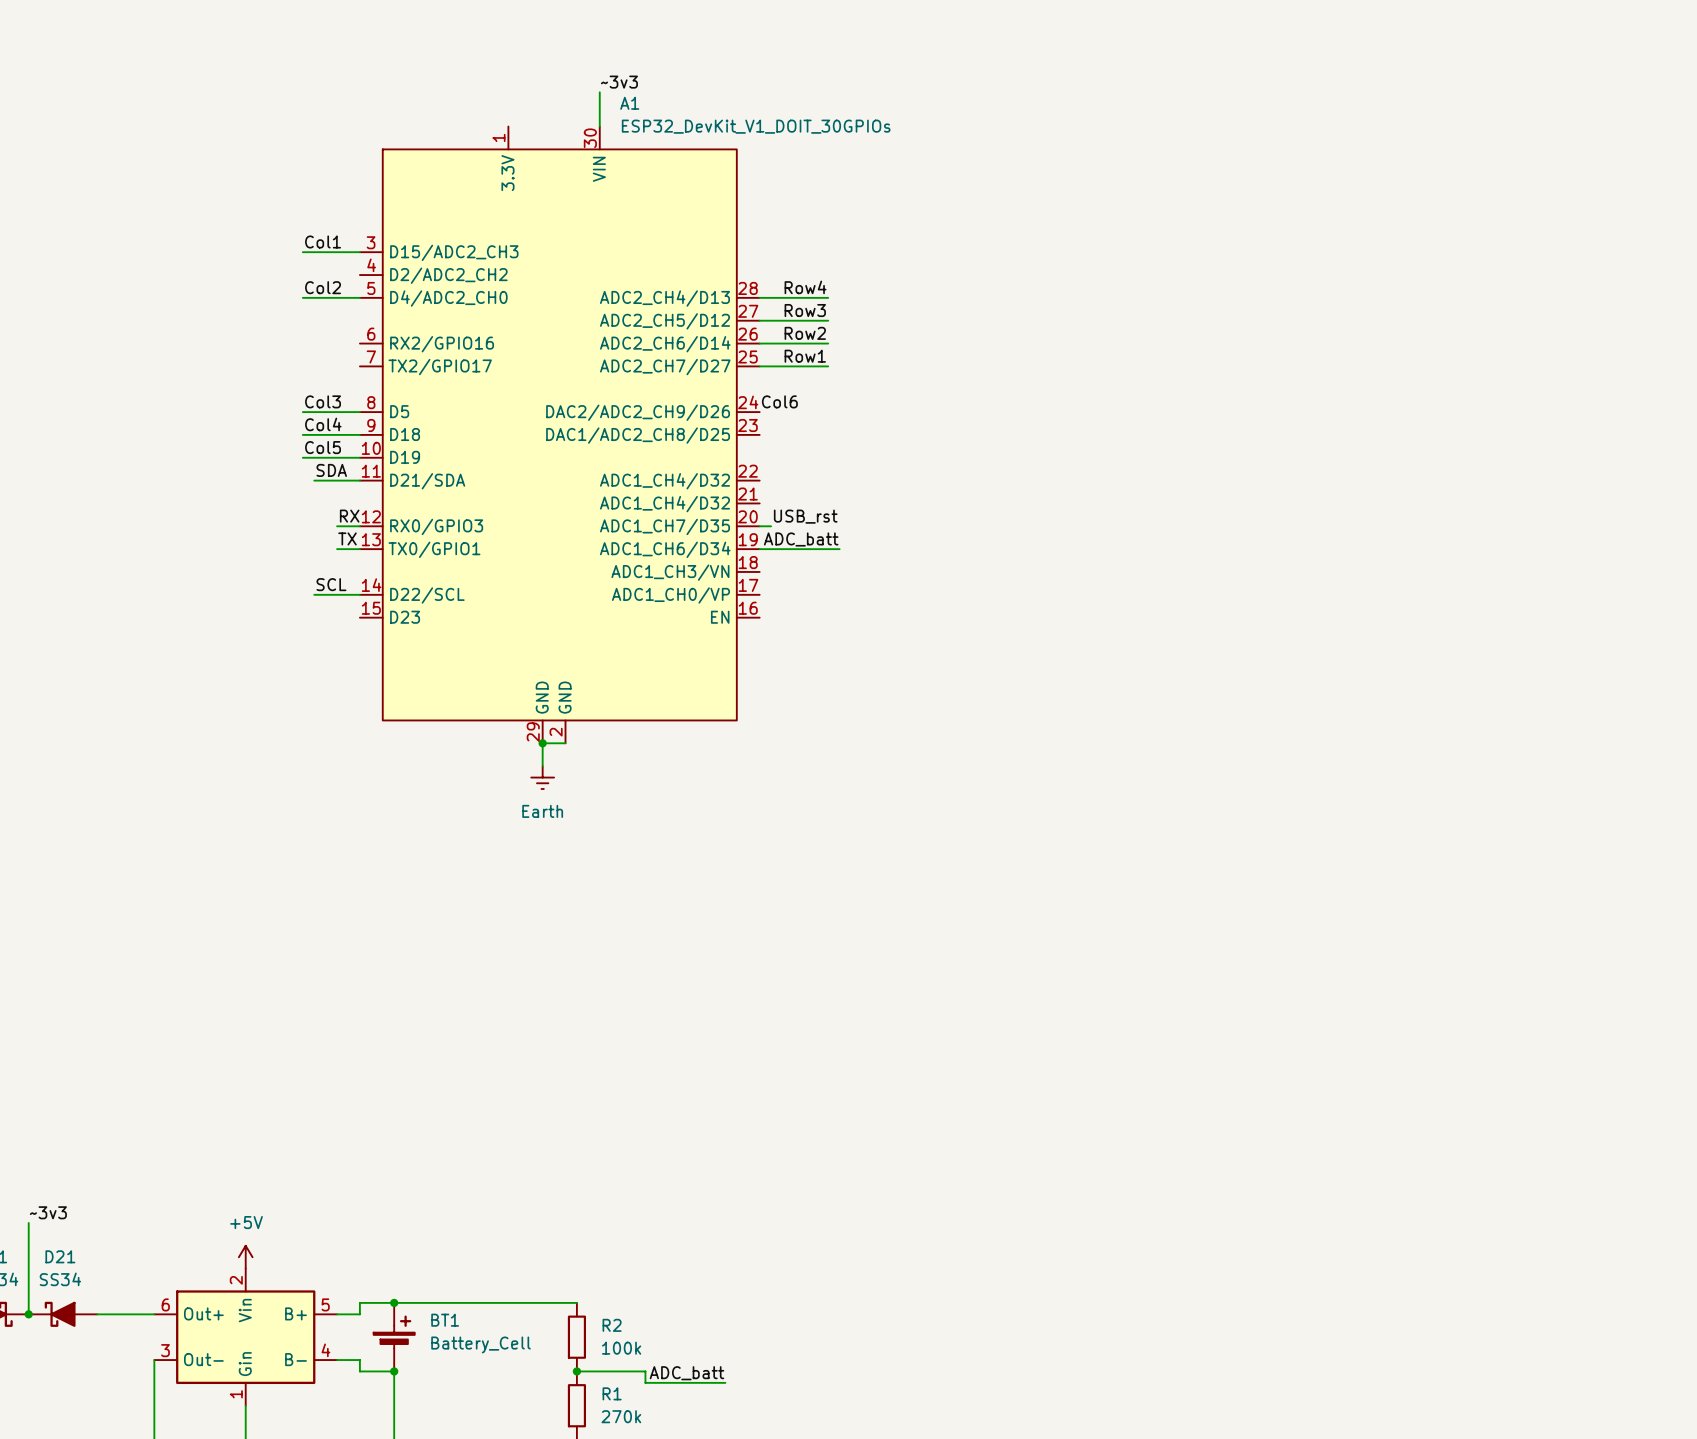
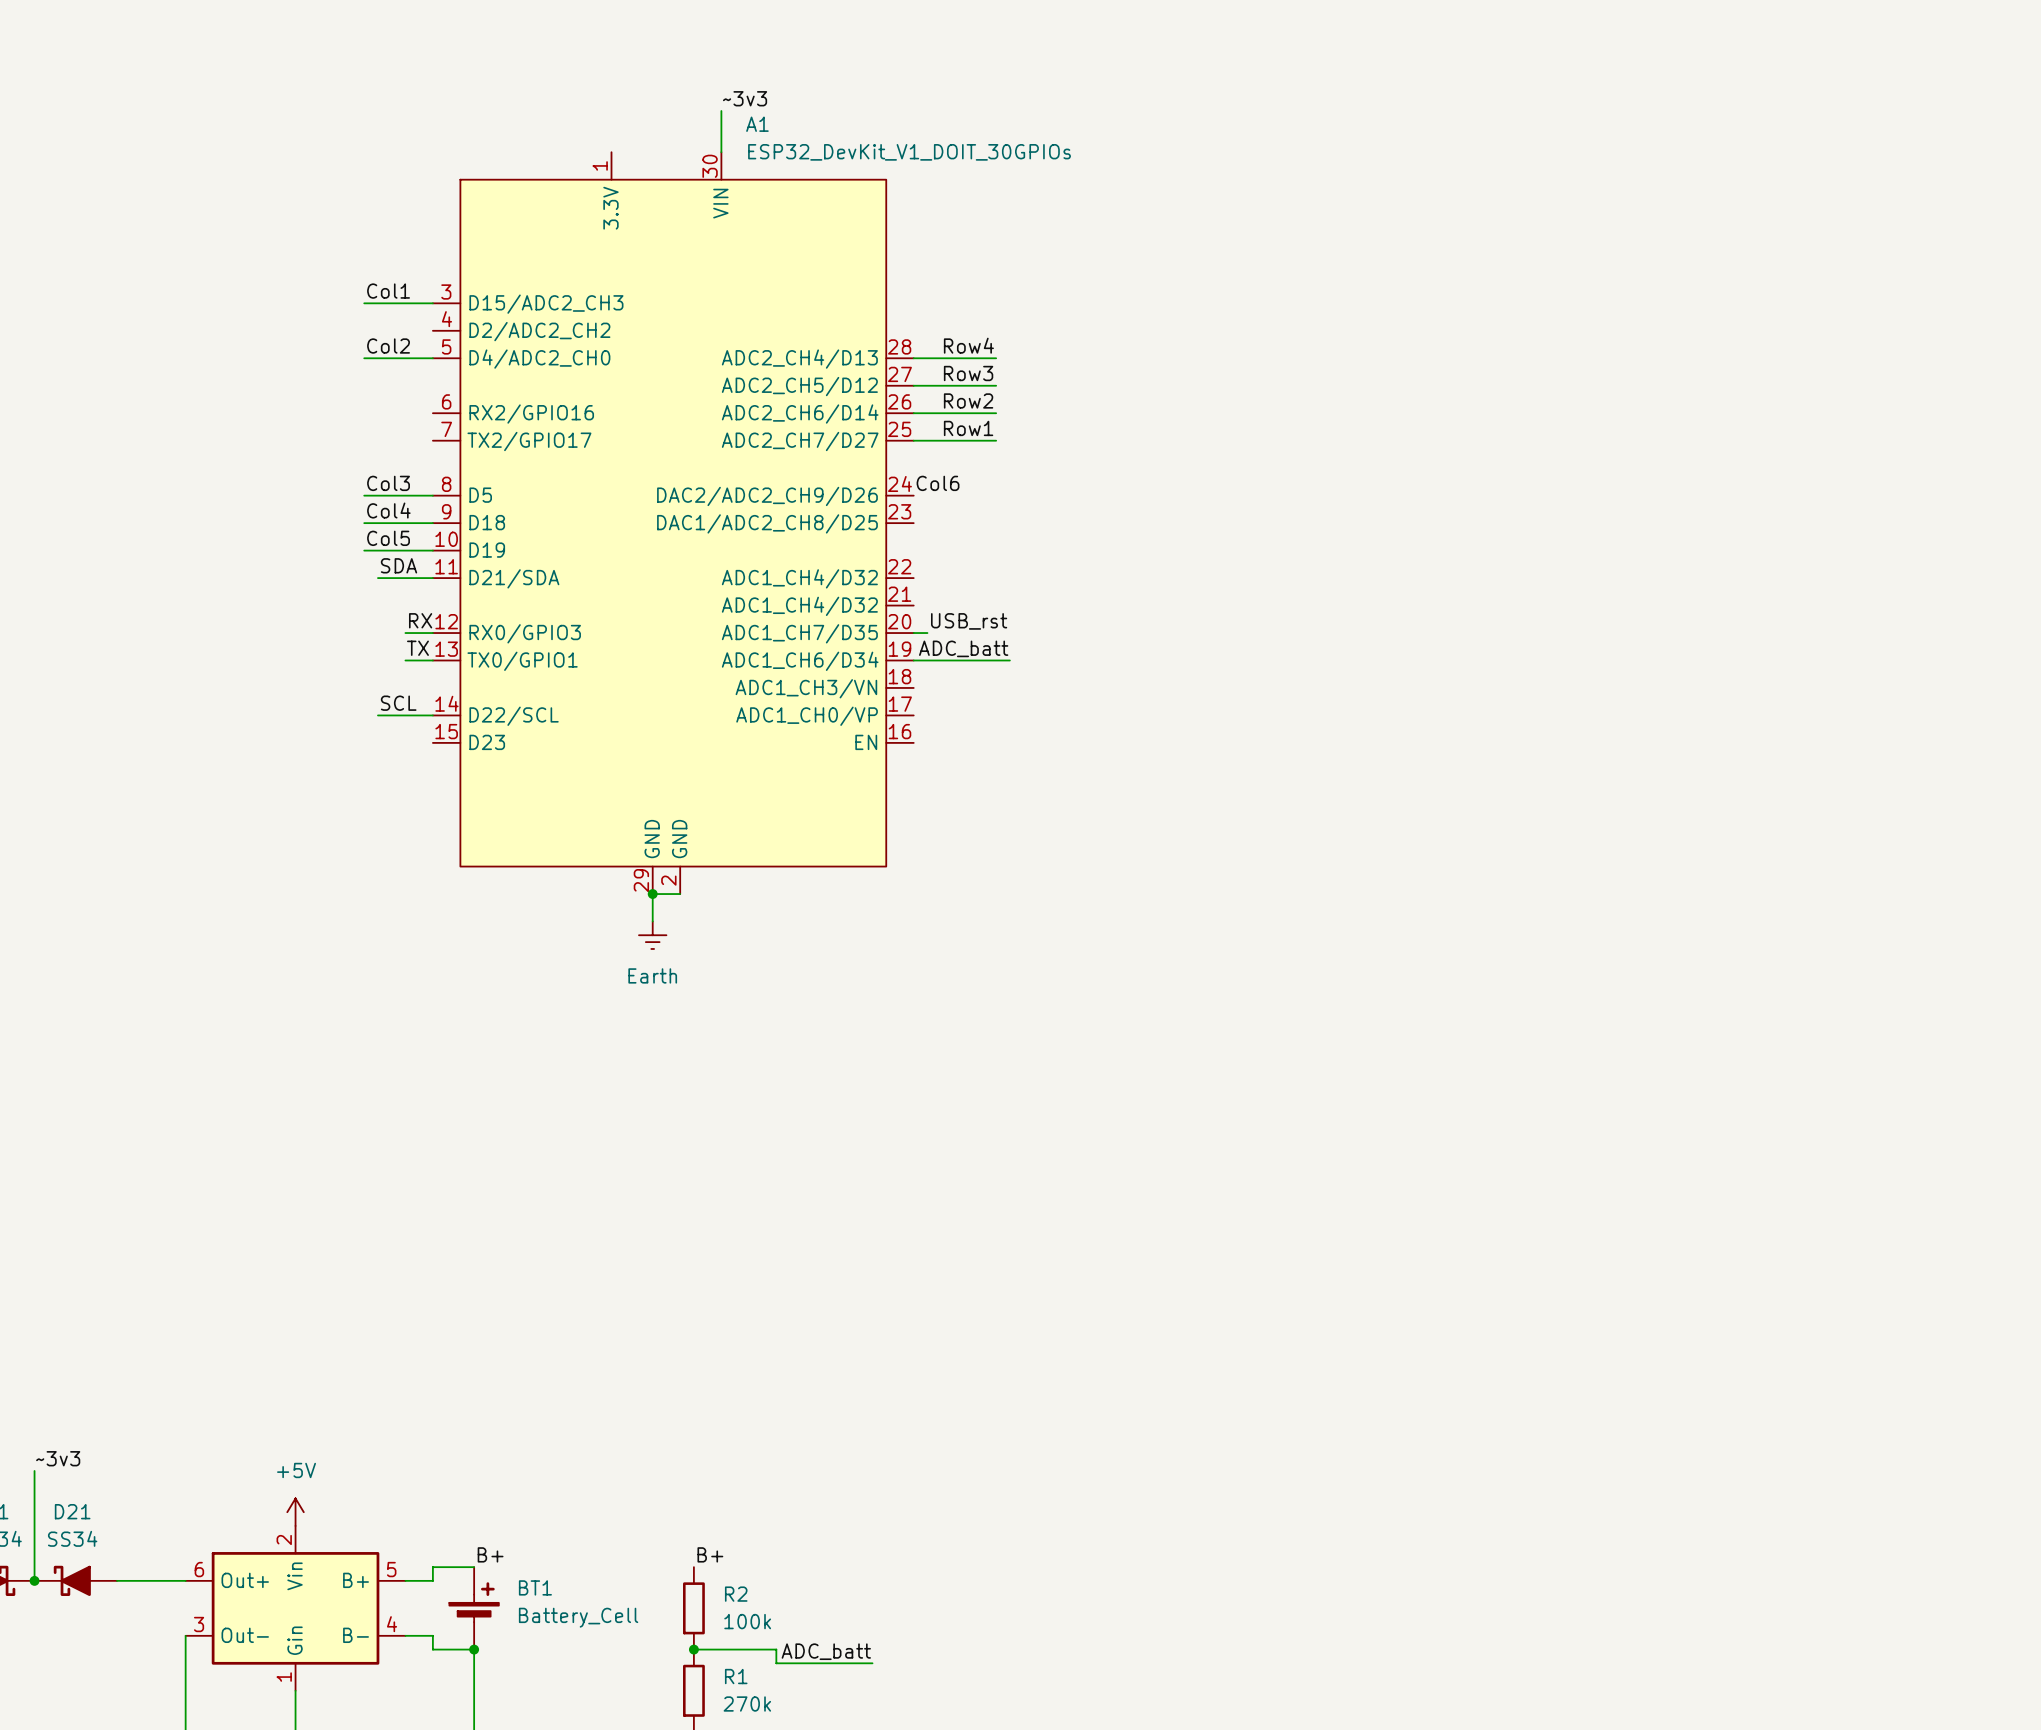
label: none -> B+ (490, 1554)
label: none -> B+ (710, 1554)
wire: (394, 1302) (576, 1302) -> none
junction: (394, 1302) -> none

